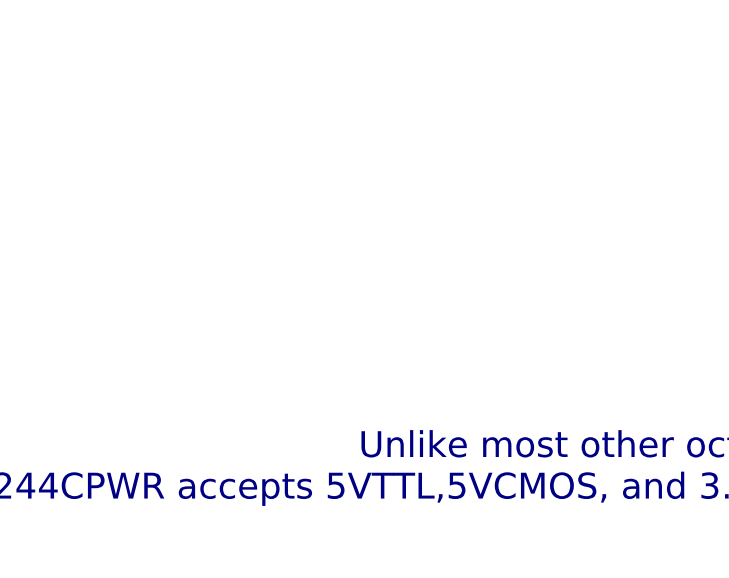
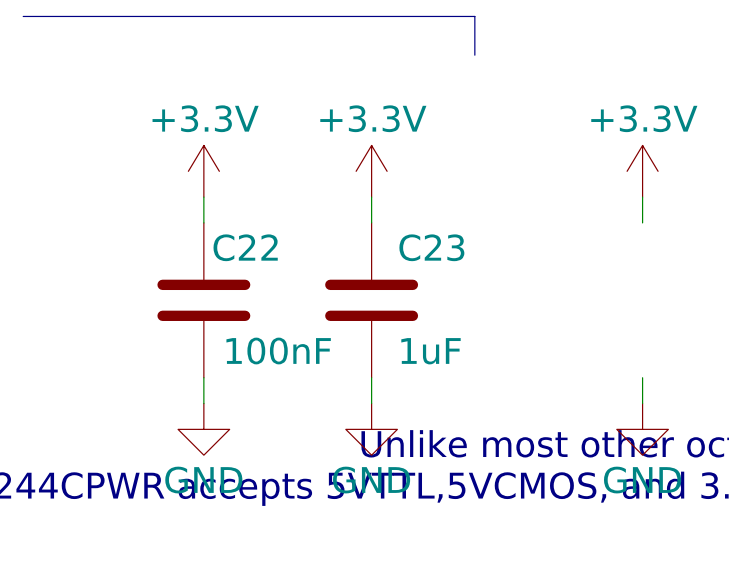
line: none -> (23, 16) (474, 16) (474, 55)
power symbol: none -> +3.3V (203, 171)
power symbol: none -> +3.3V (371, 171)
power symbol: none -> +3.3V (642, 171)
wire: none -> (203, 197) (203, 222)
wire: none -> (371, 197) (371, 222)
wire: none -> (642, 197) (642, 222)
C22: none -> 100nF (203, 300)
C23: none -> 1uF (371, 300)
wire: none -> (203, 377) (203, 403)
wire: none -> (371, 377) (371, 403)
wire: none -> (642, 377) (642, 403)
power symbol: none -> GND (203, 429)
power symbol: none -> GND (371, 429)
power symbol: none -> GND (642, 429)

